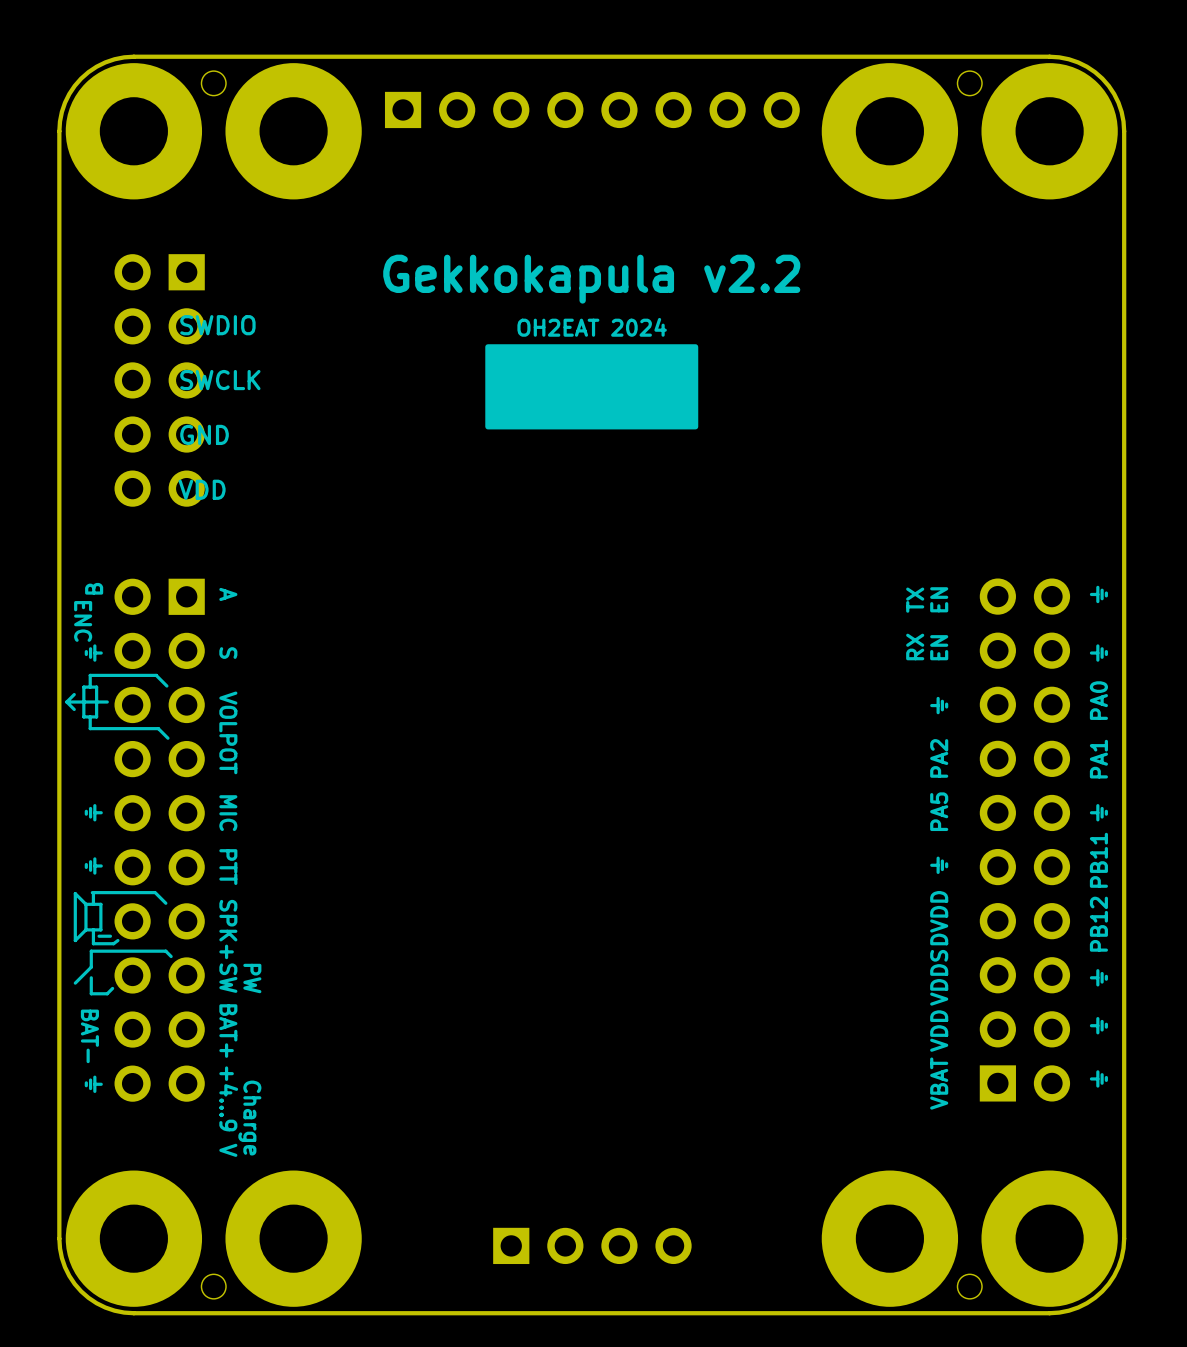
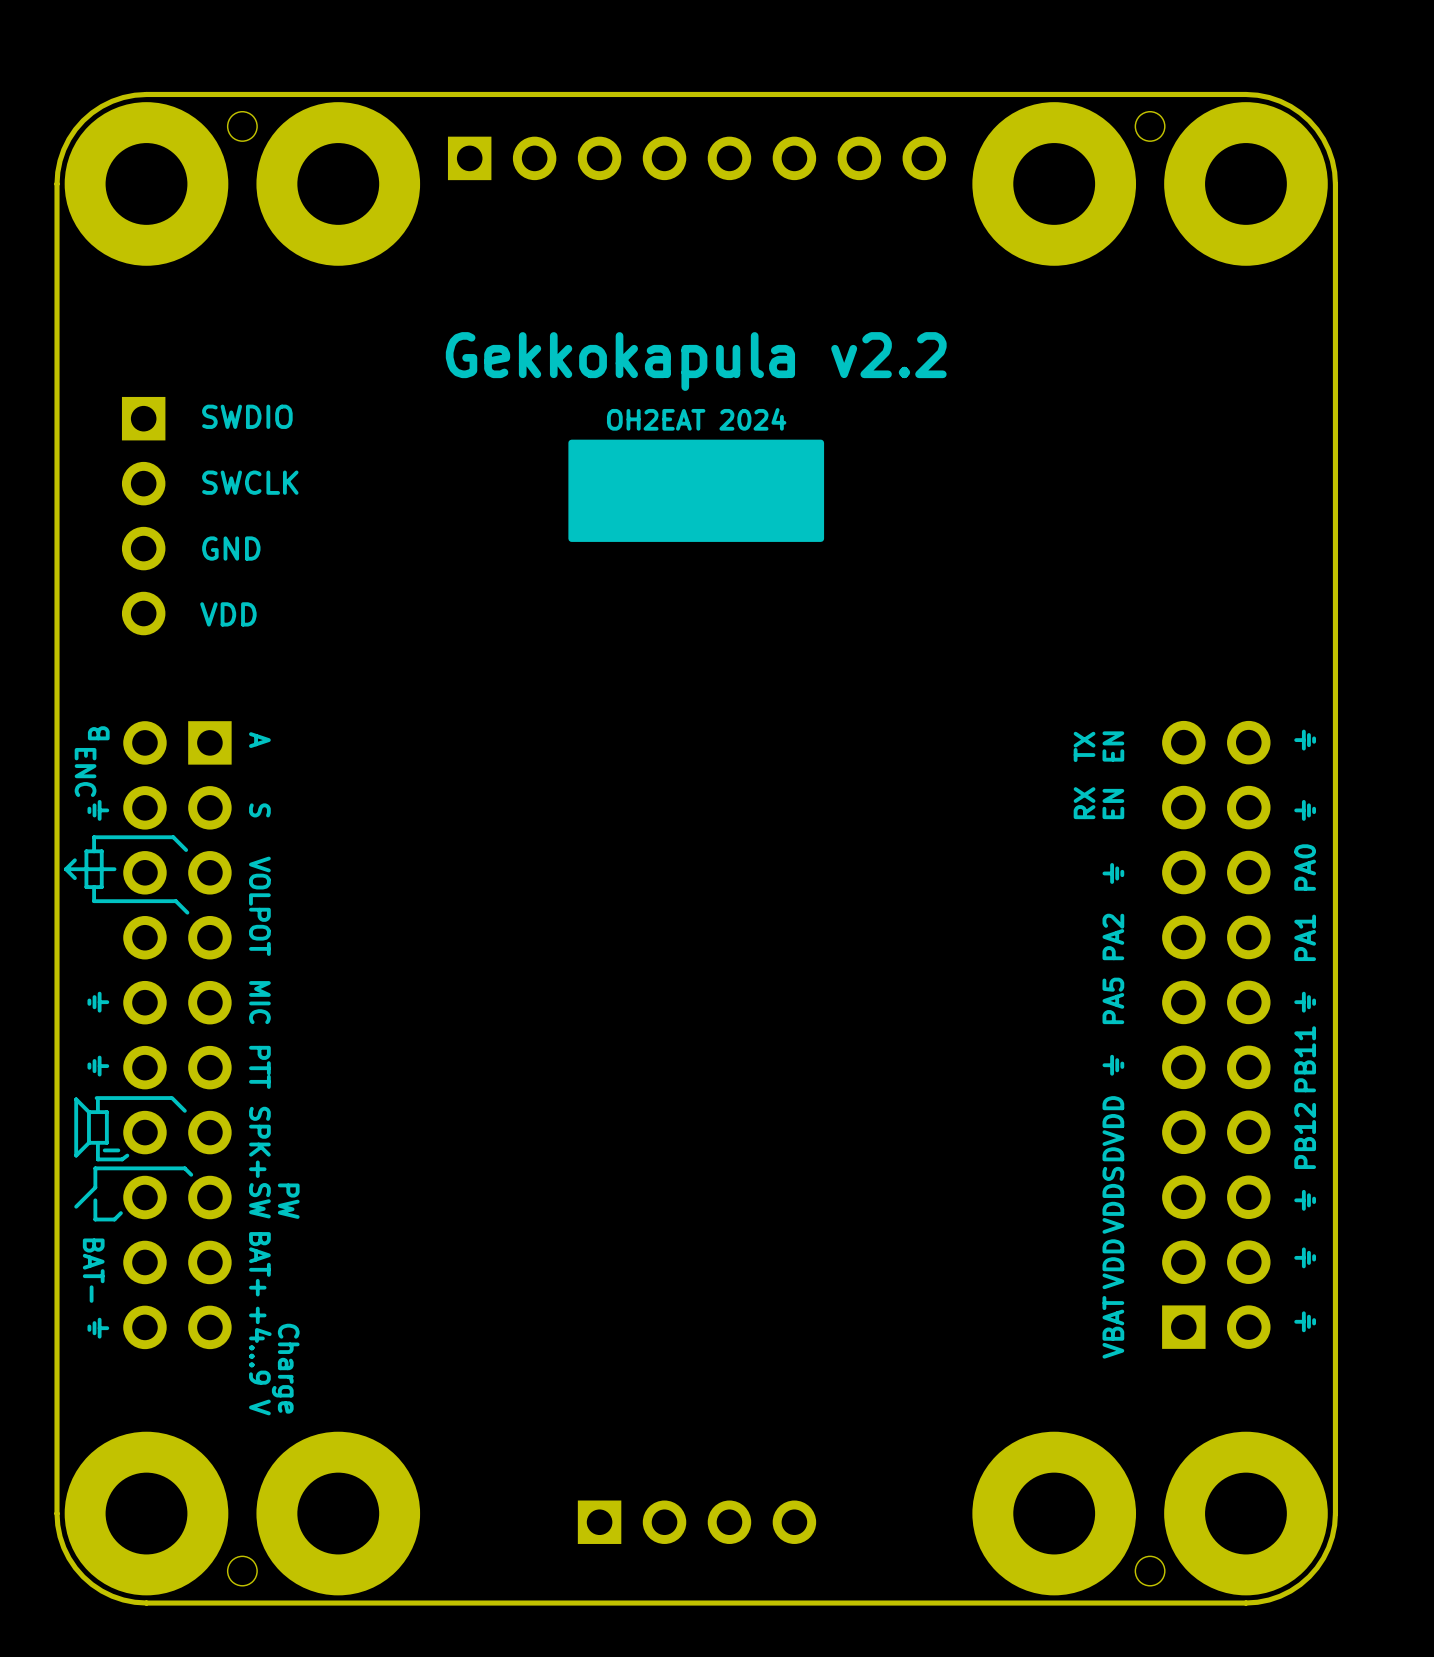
part: (159, 380) -> none
part: none -> (143, 516)

